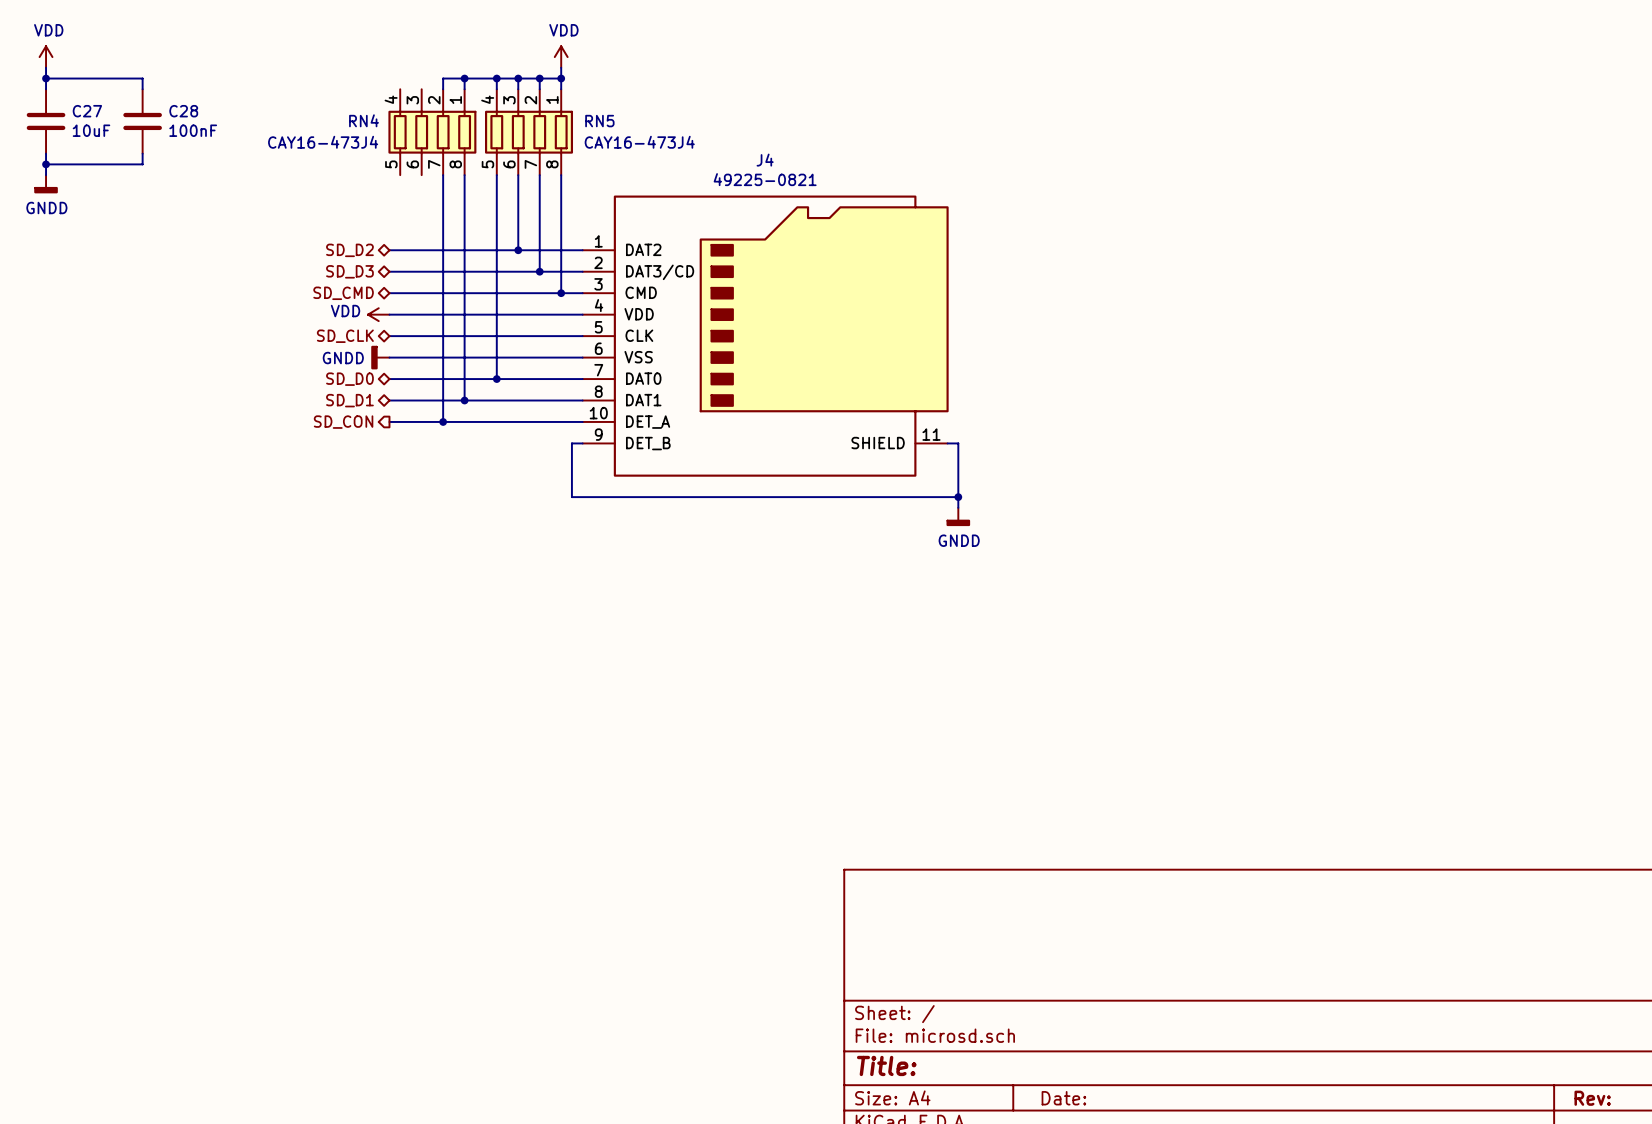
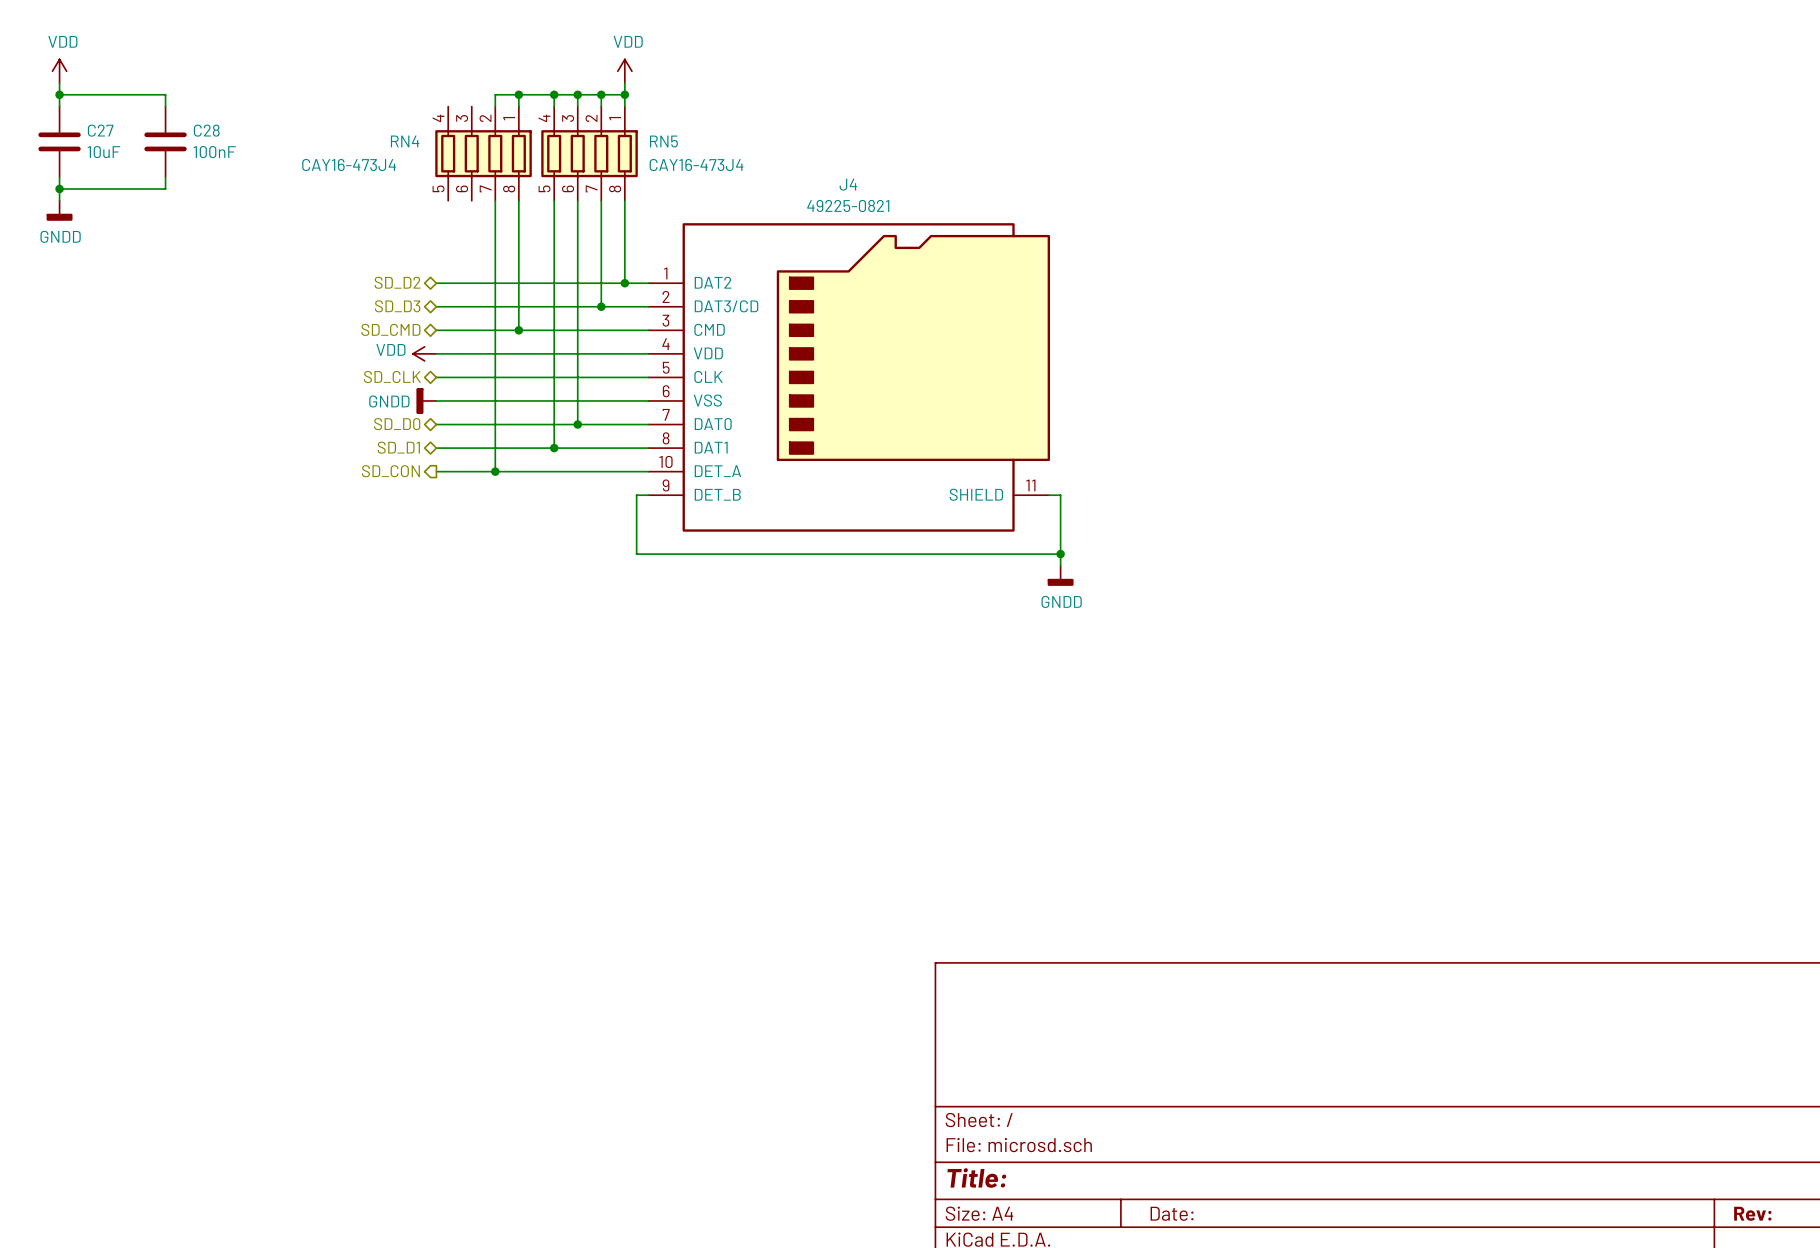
wire: none -> (577, 283) (577, 424)
junction: (518, 250) -> none
wire: (561, 250) (561, 293) -> none
junction: none -> (624, 283)
wire: (464, 293) (464, 400) -> none
junction: none -> (518, 330)
junction: (561, 293) -> none
wire: none -> (554, 424) (554, 448)
junction: (496, 379) -> none
junction: none -> (577, 424)
junction: (464, 400) -> none
junction: none -> (554, 448)

